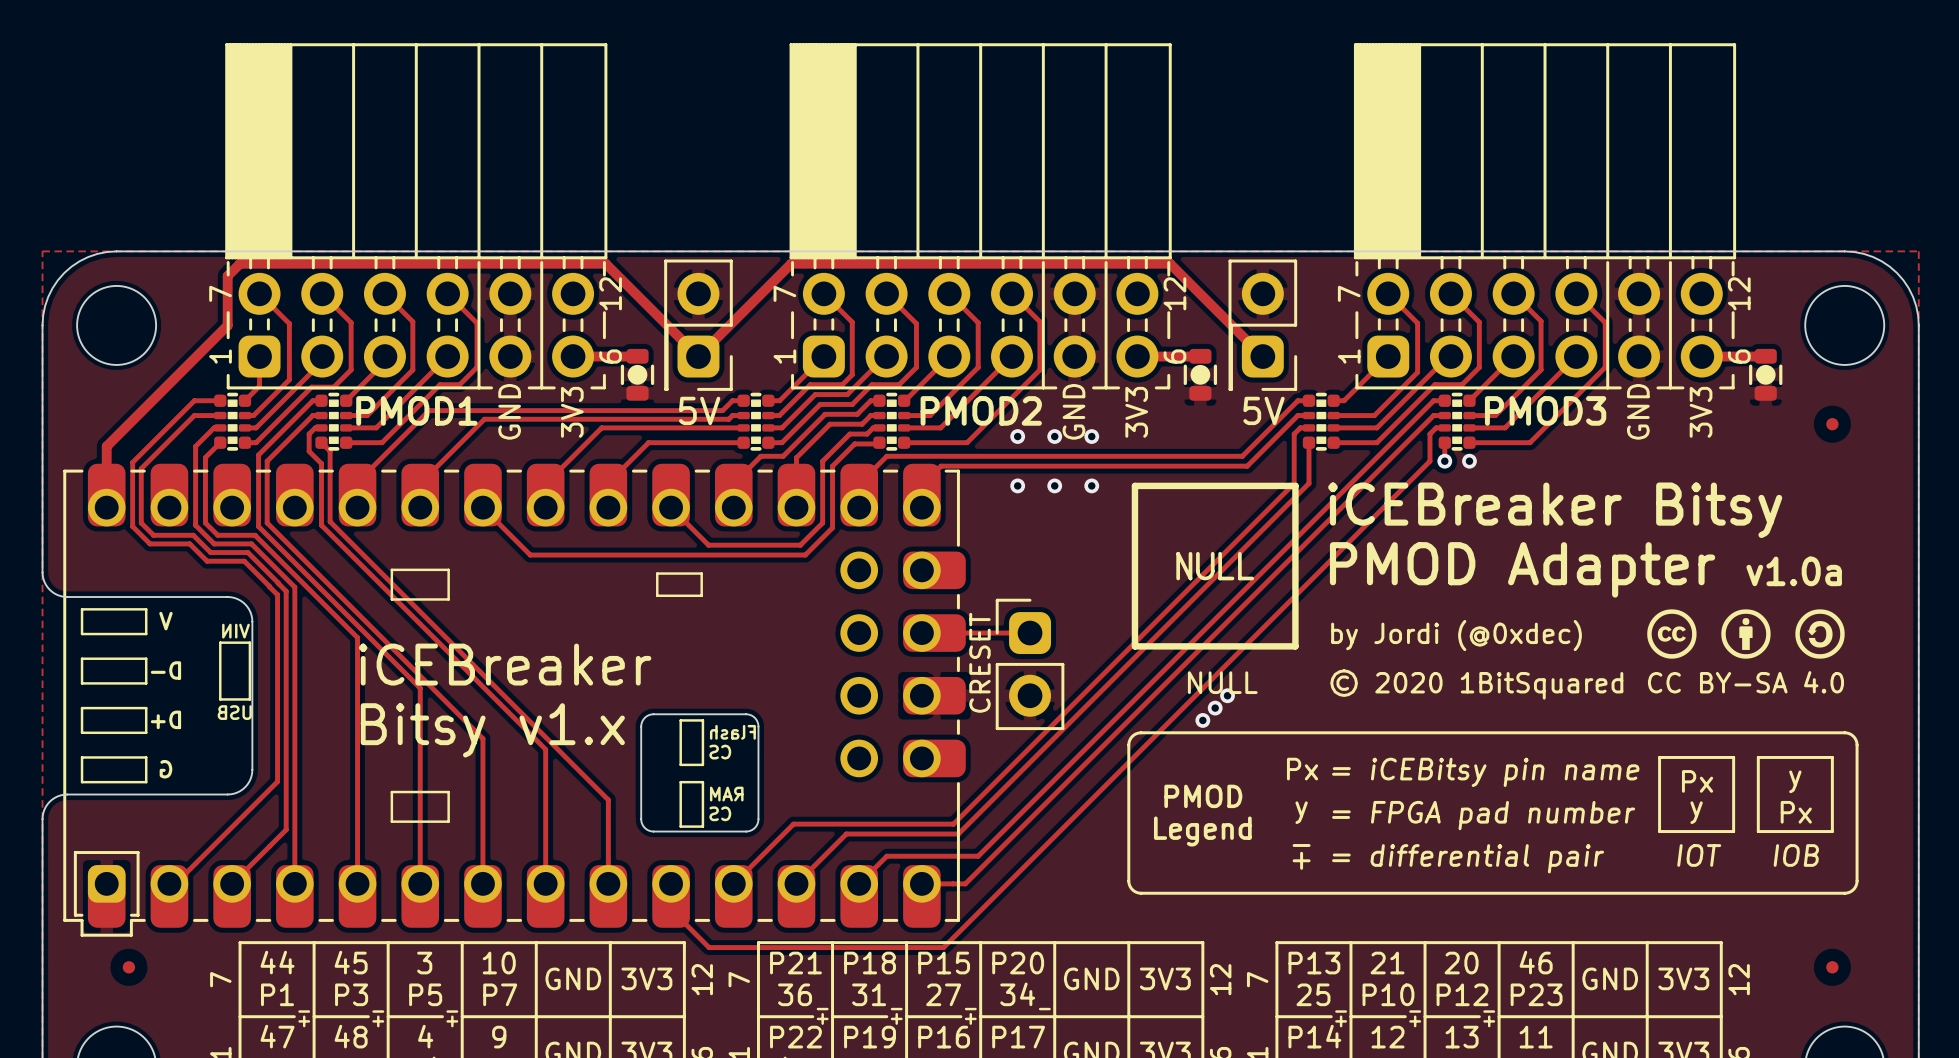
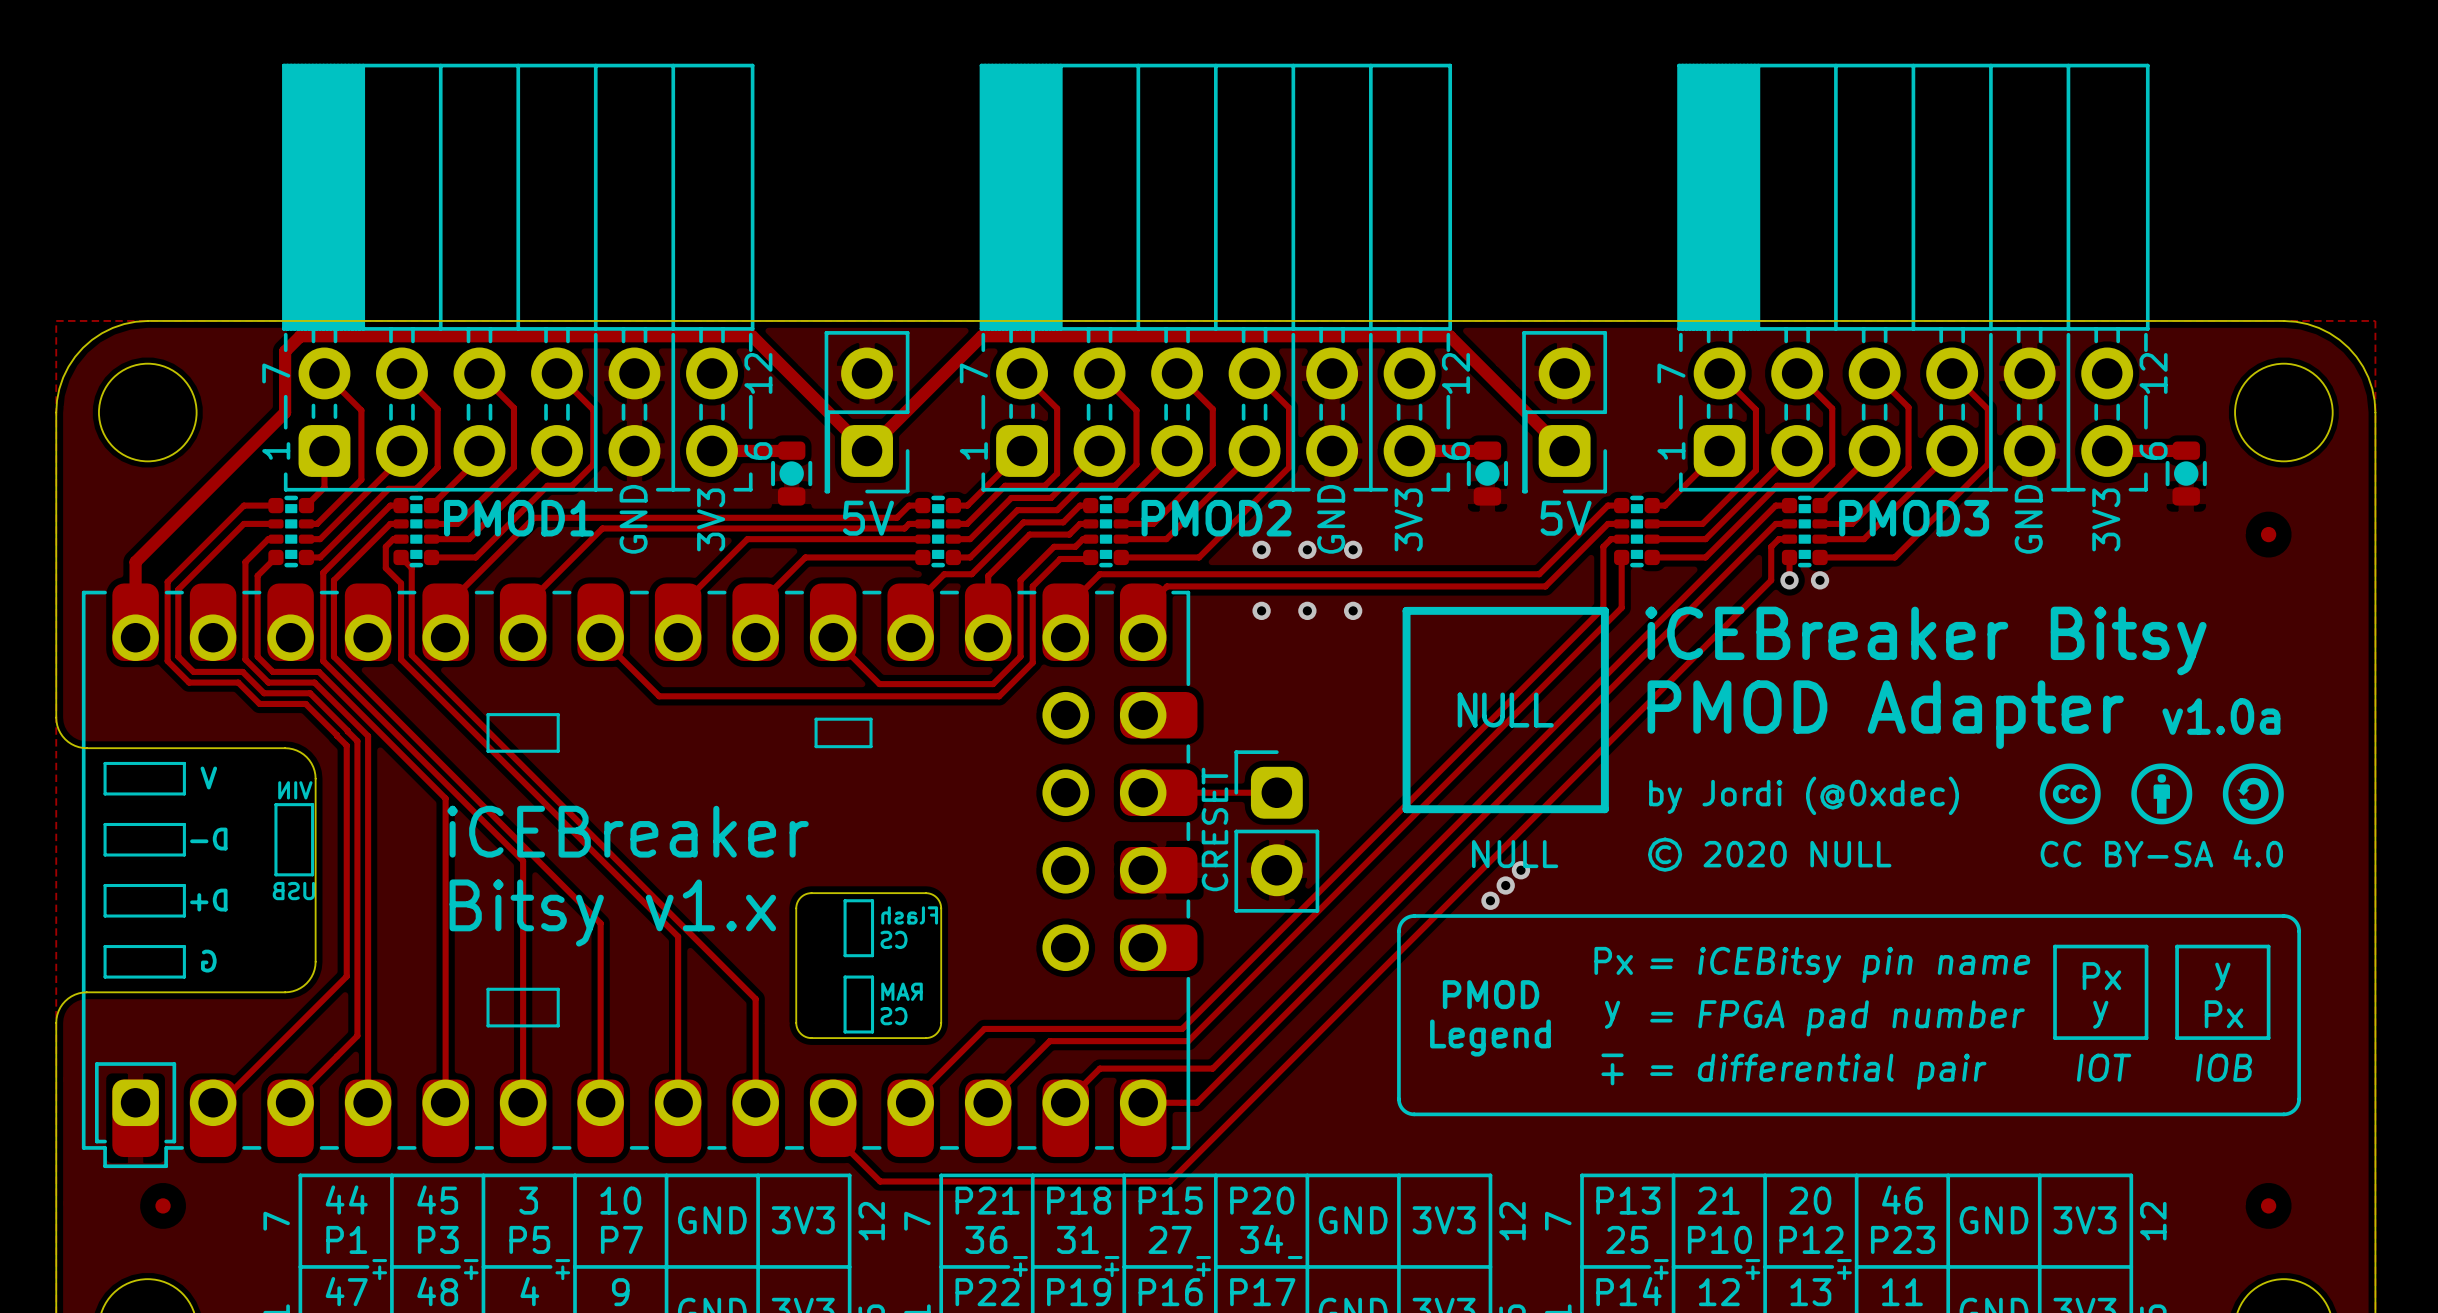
text: © 2020 1BitSquared (1476, 684) -> © 2020 NULL (1769, 854)

